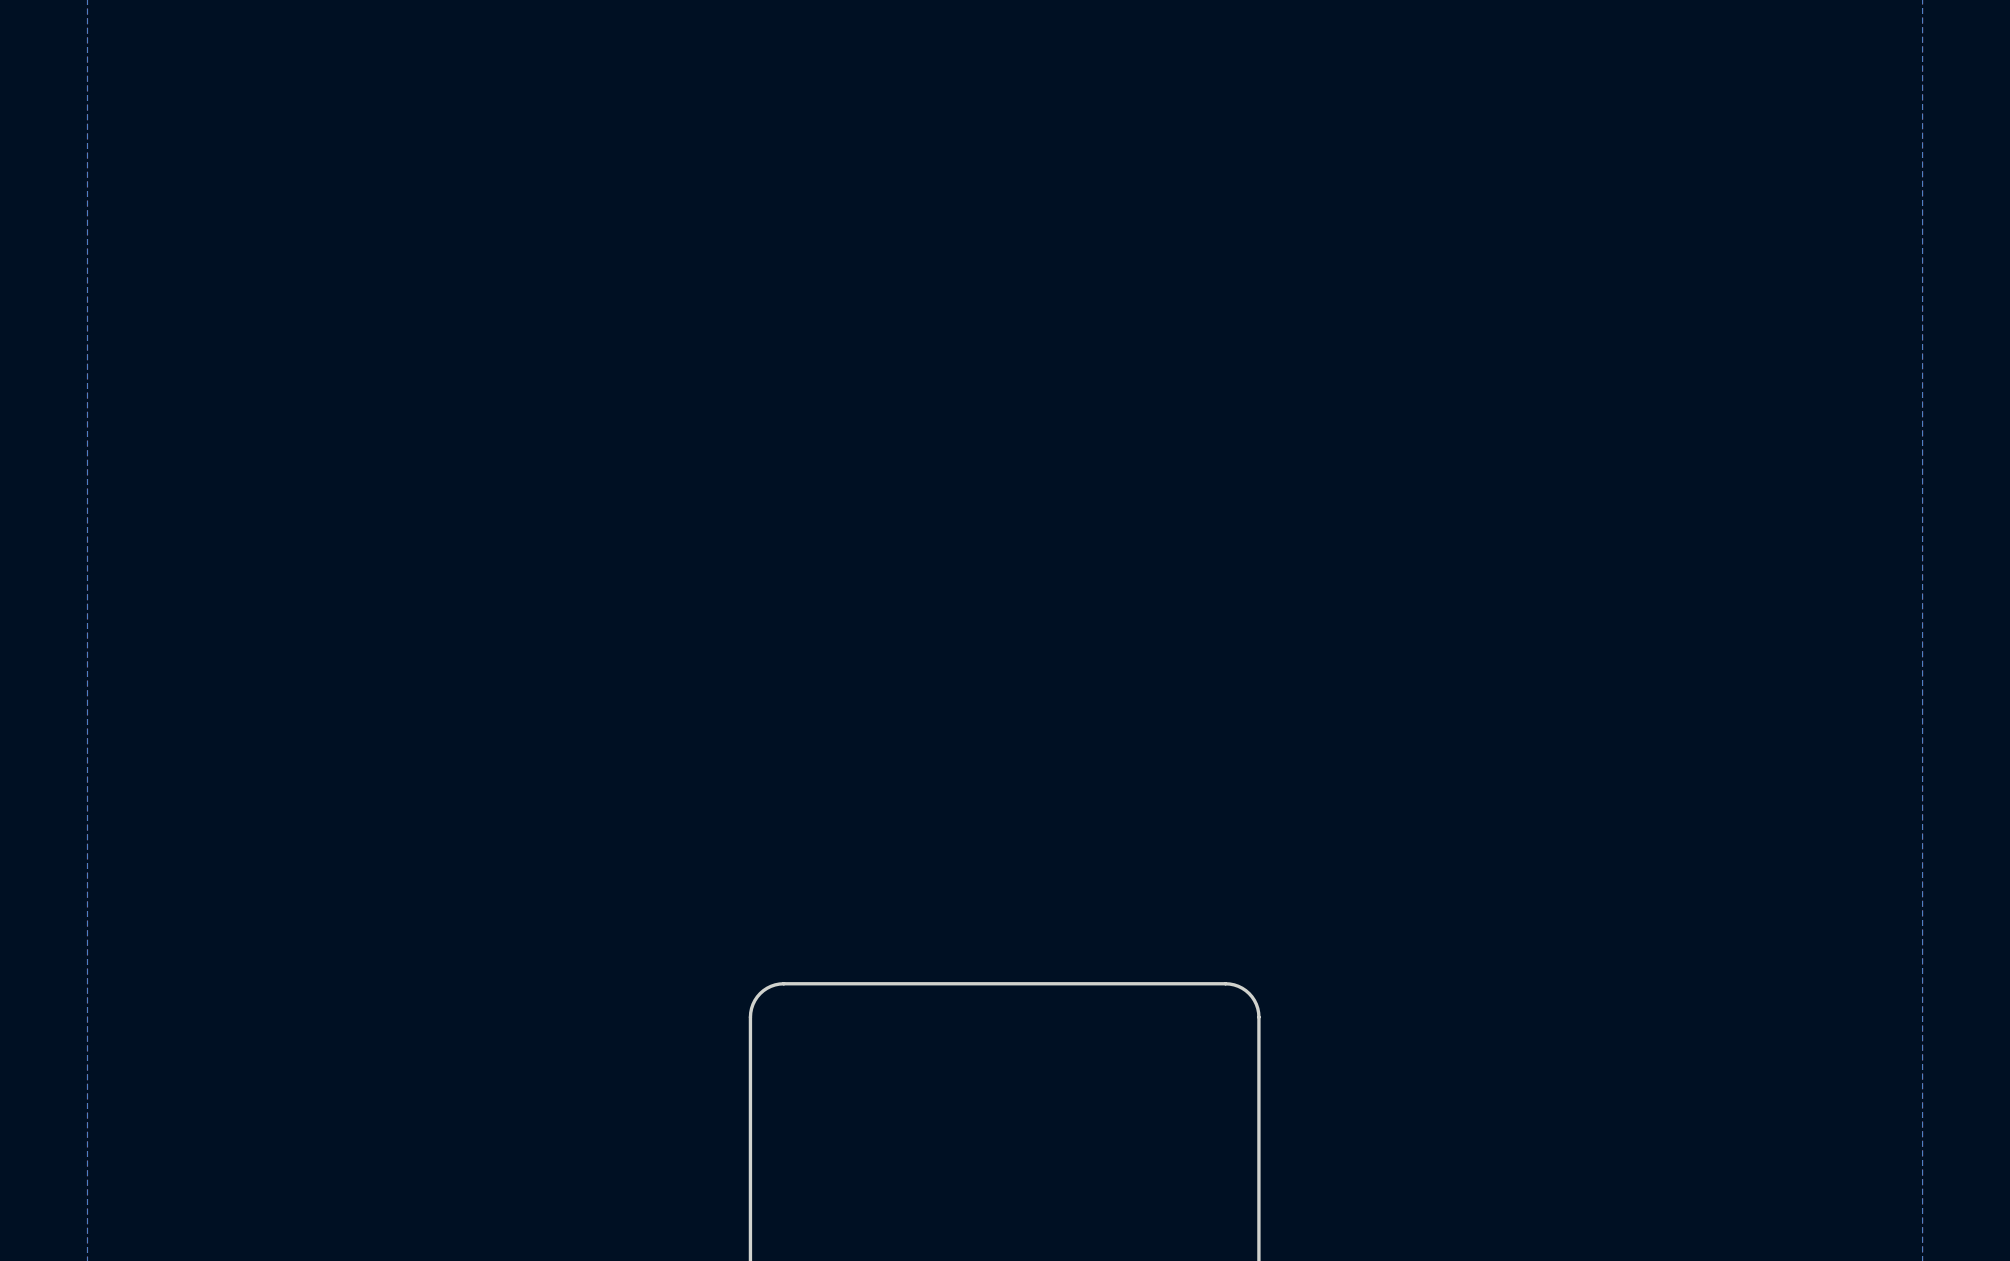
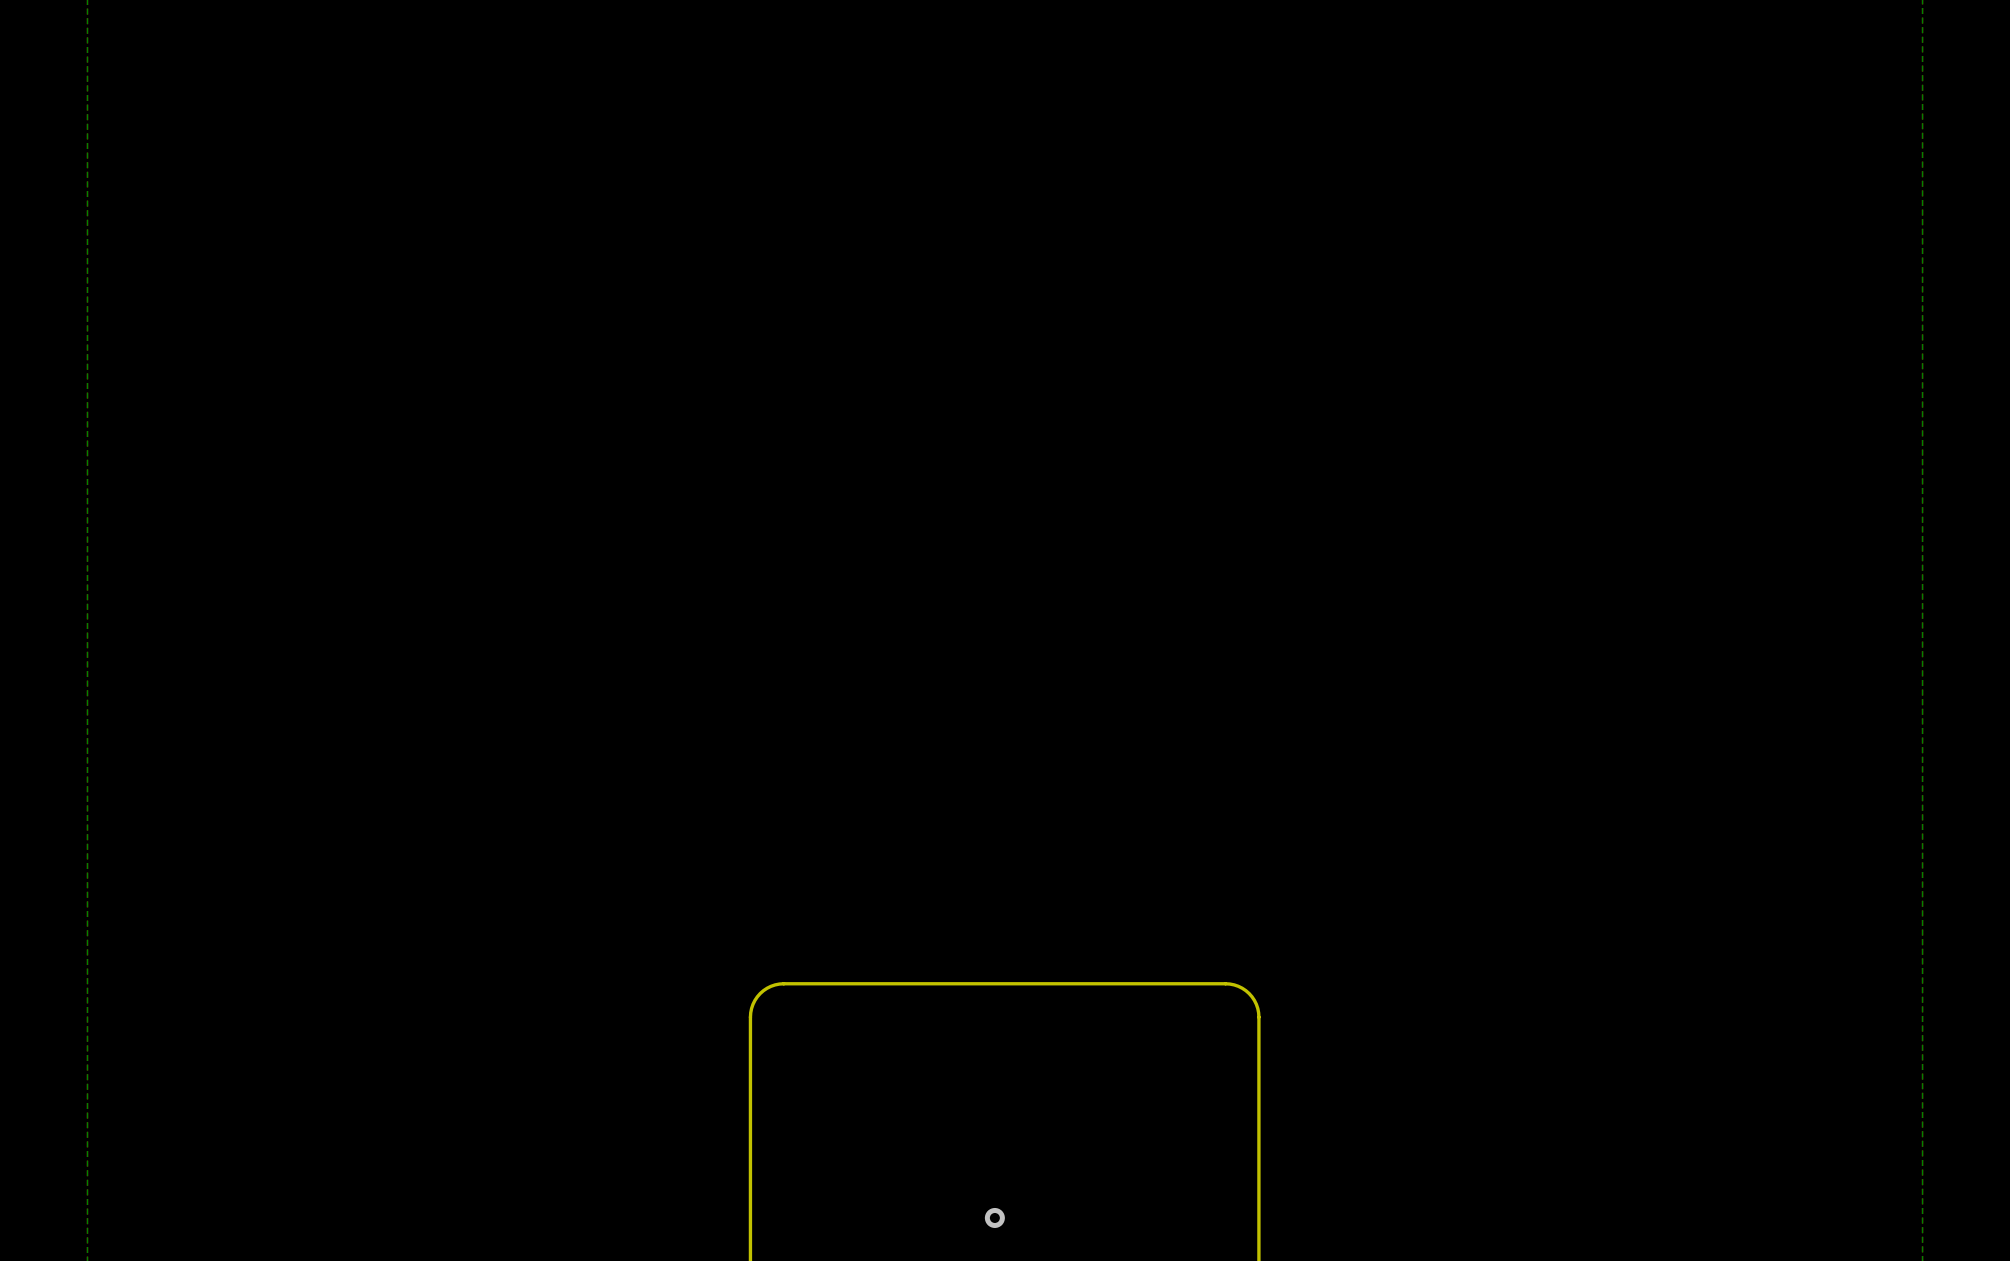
via: none -> (994, 1217)

